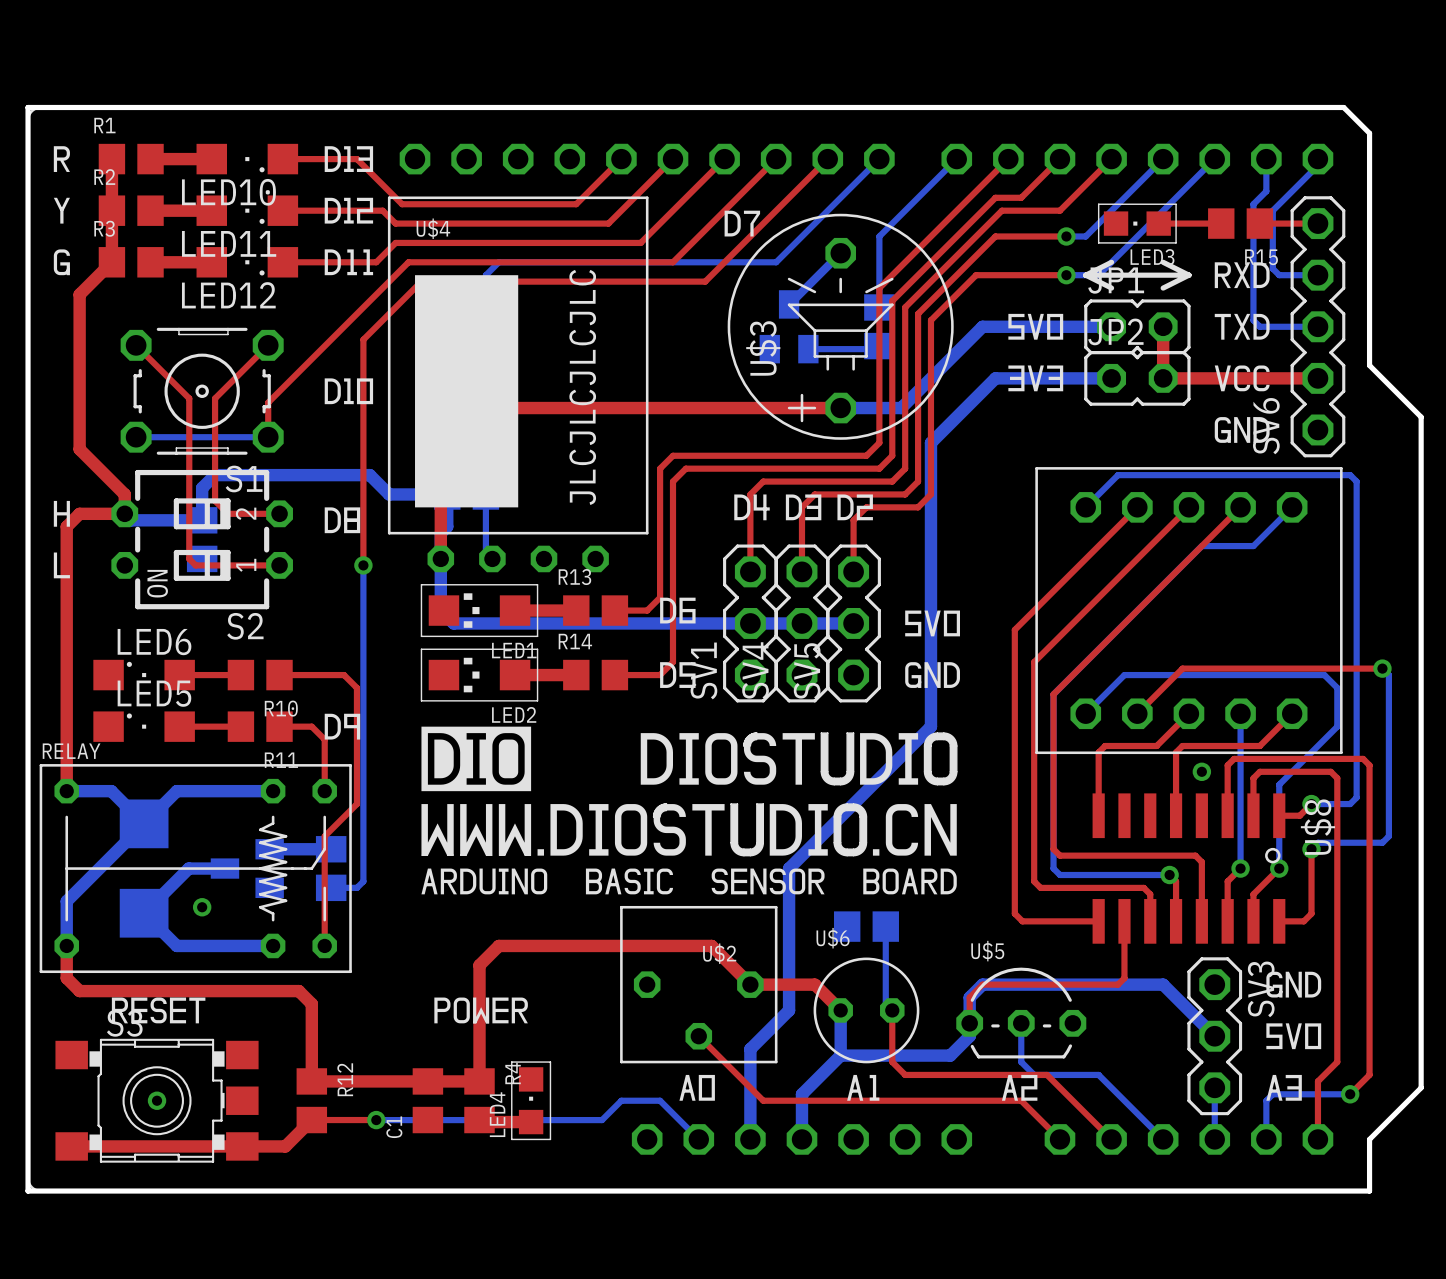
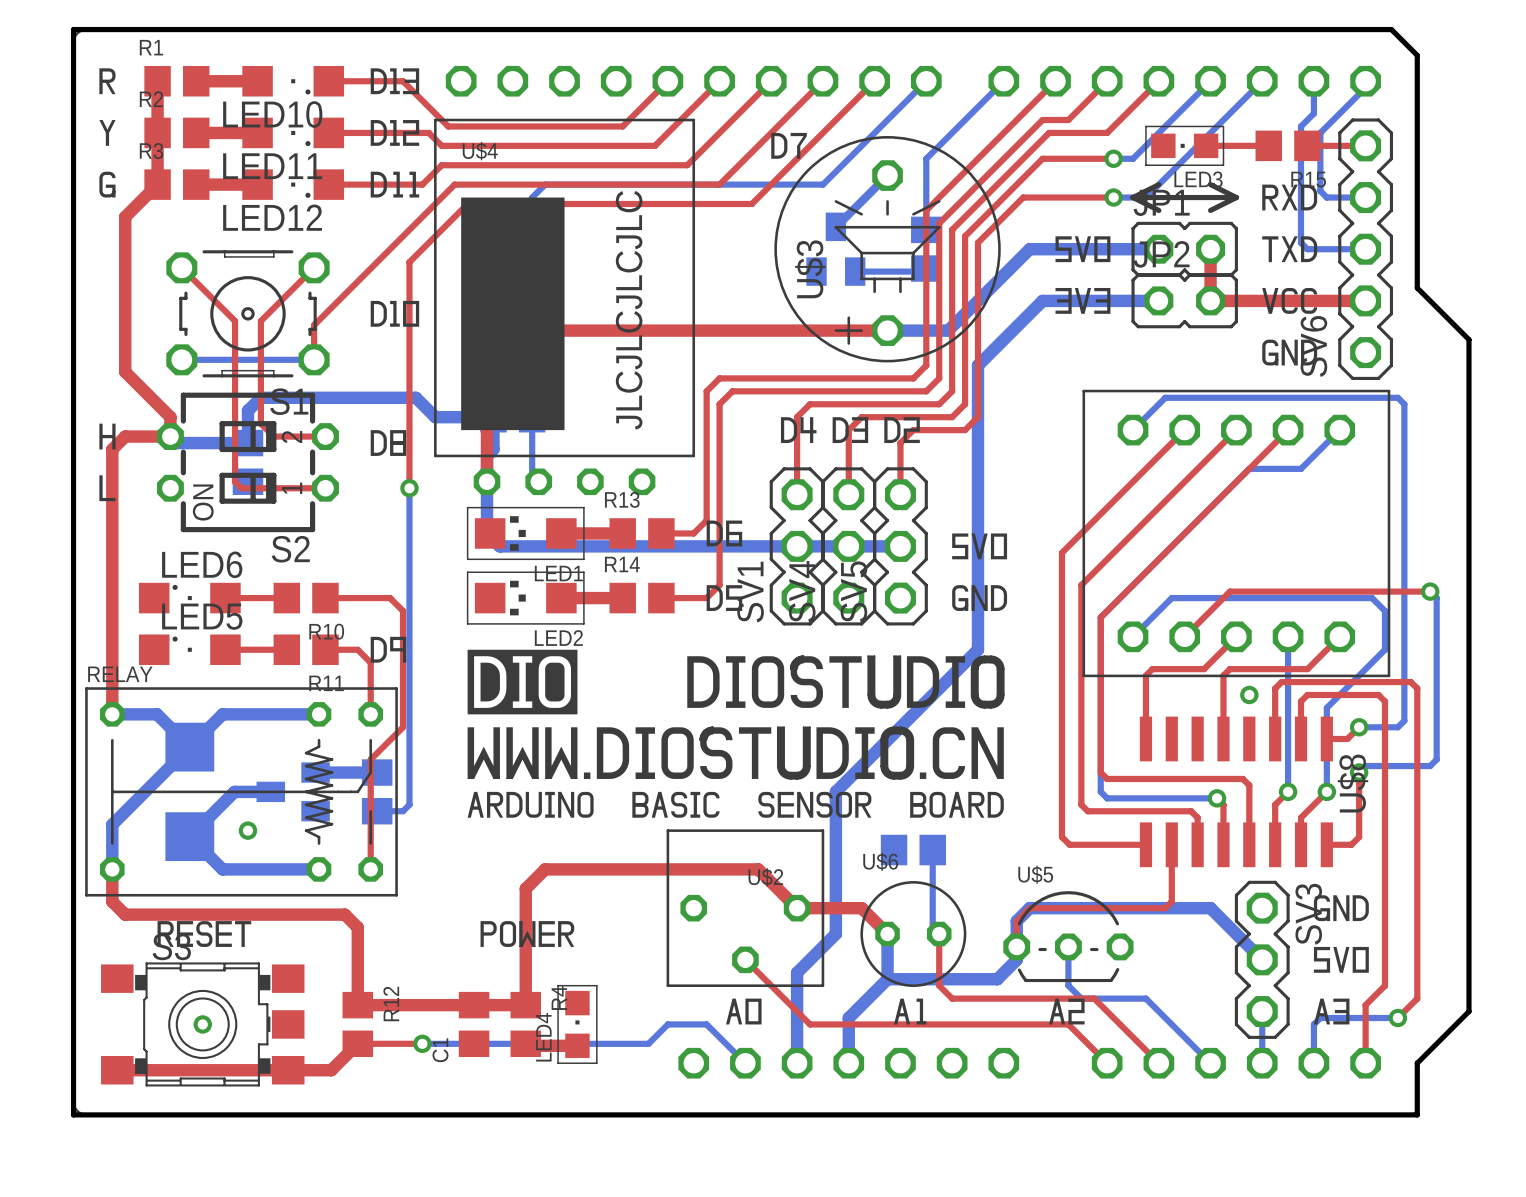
U$8 footprint: [1092, 793, 1286, 944] -> [1139, 716, 1333, 868]

